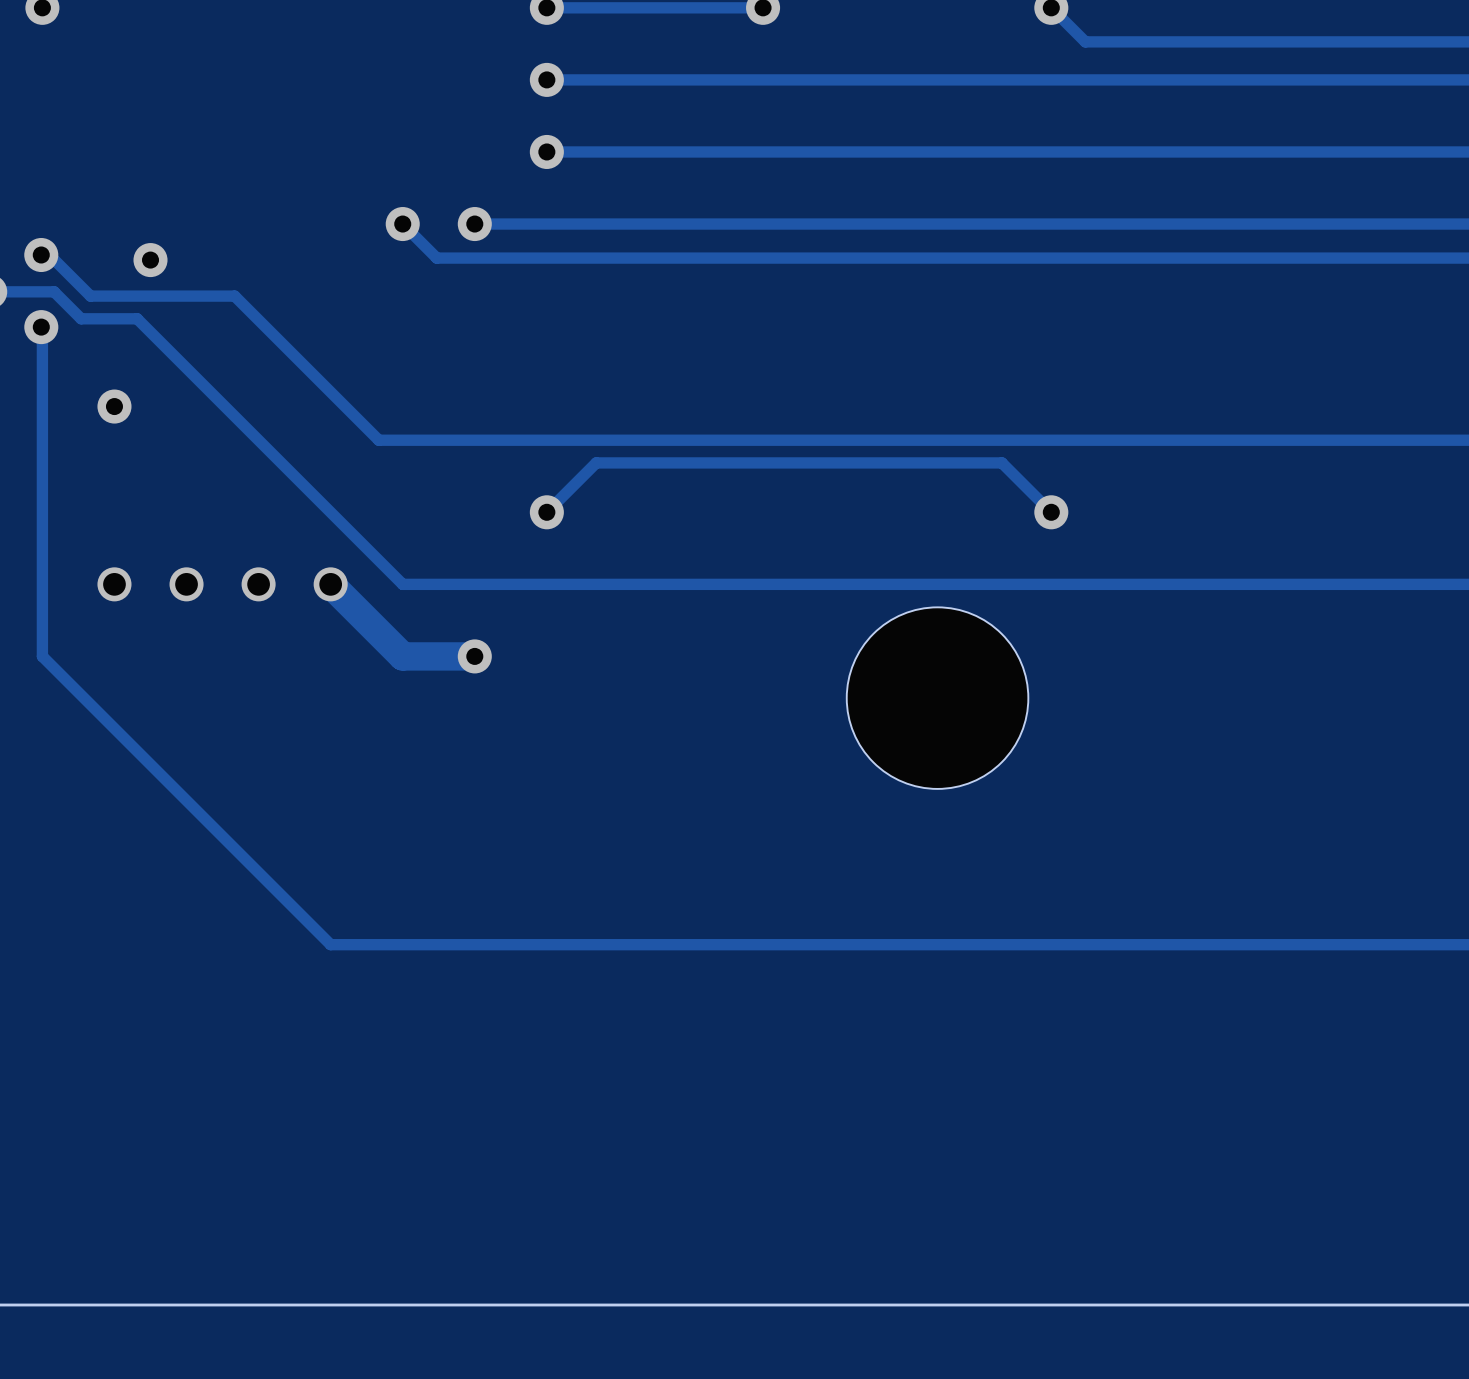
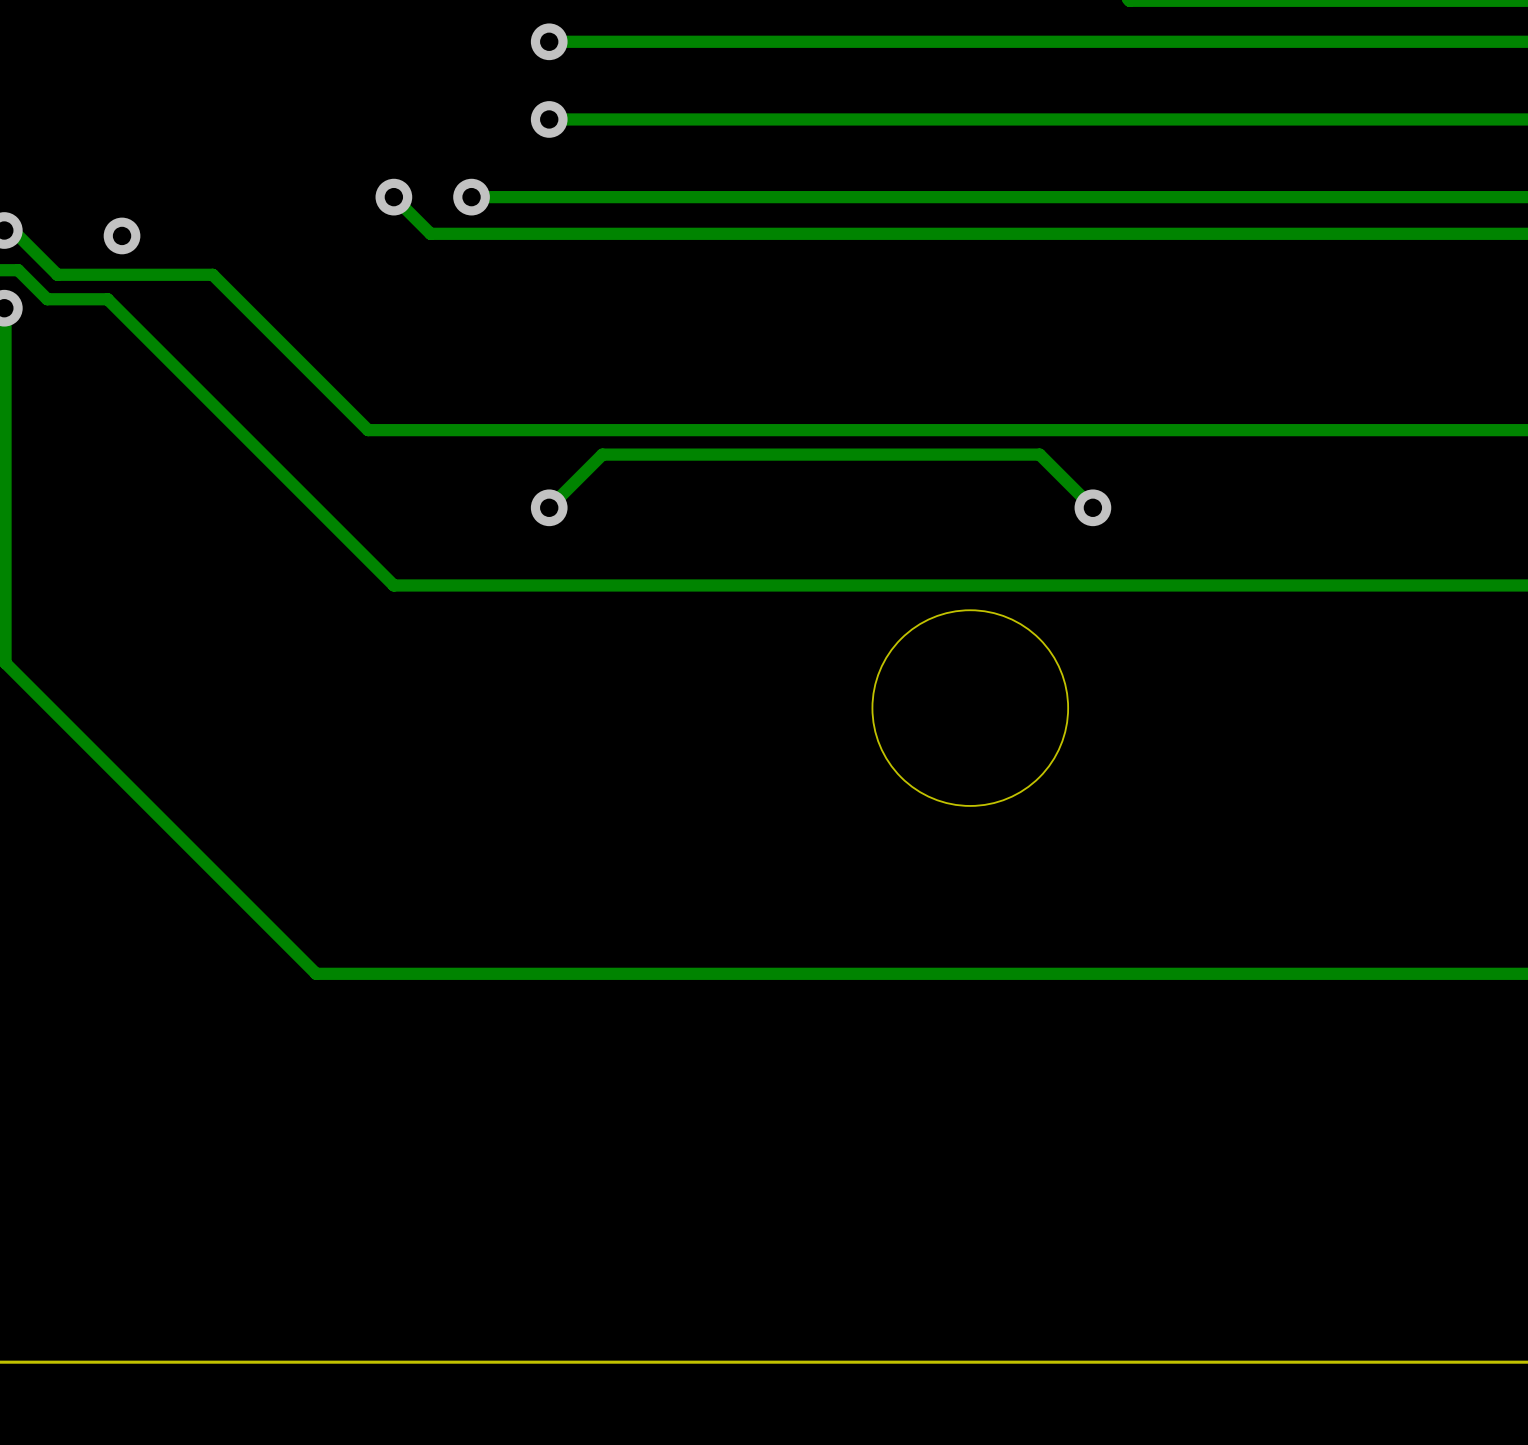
via: (114, 406) -> none
via: (114, 584) -> none
via: (186, 584) -> none
via: (258, 584) -> none
track: (330, 584) (402, 656) (474, 656) -> none
via: (330, 584) -> none
via: (474, 656) -> none

